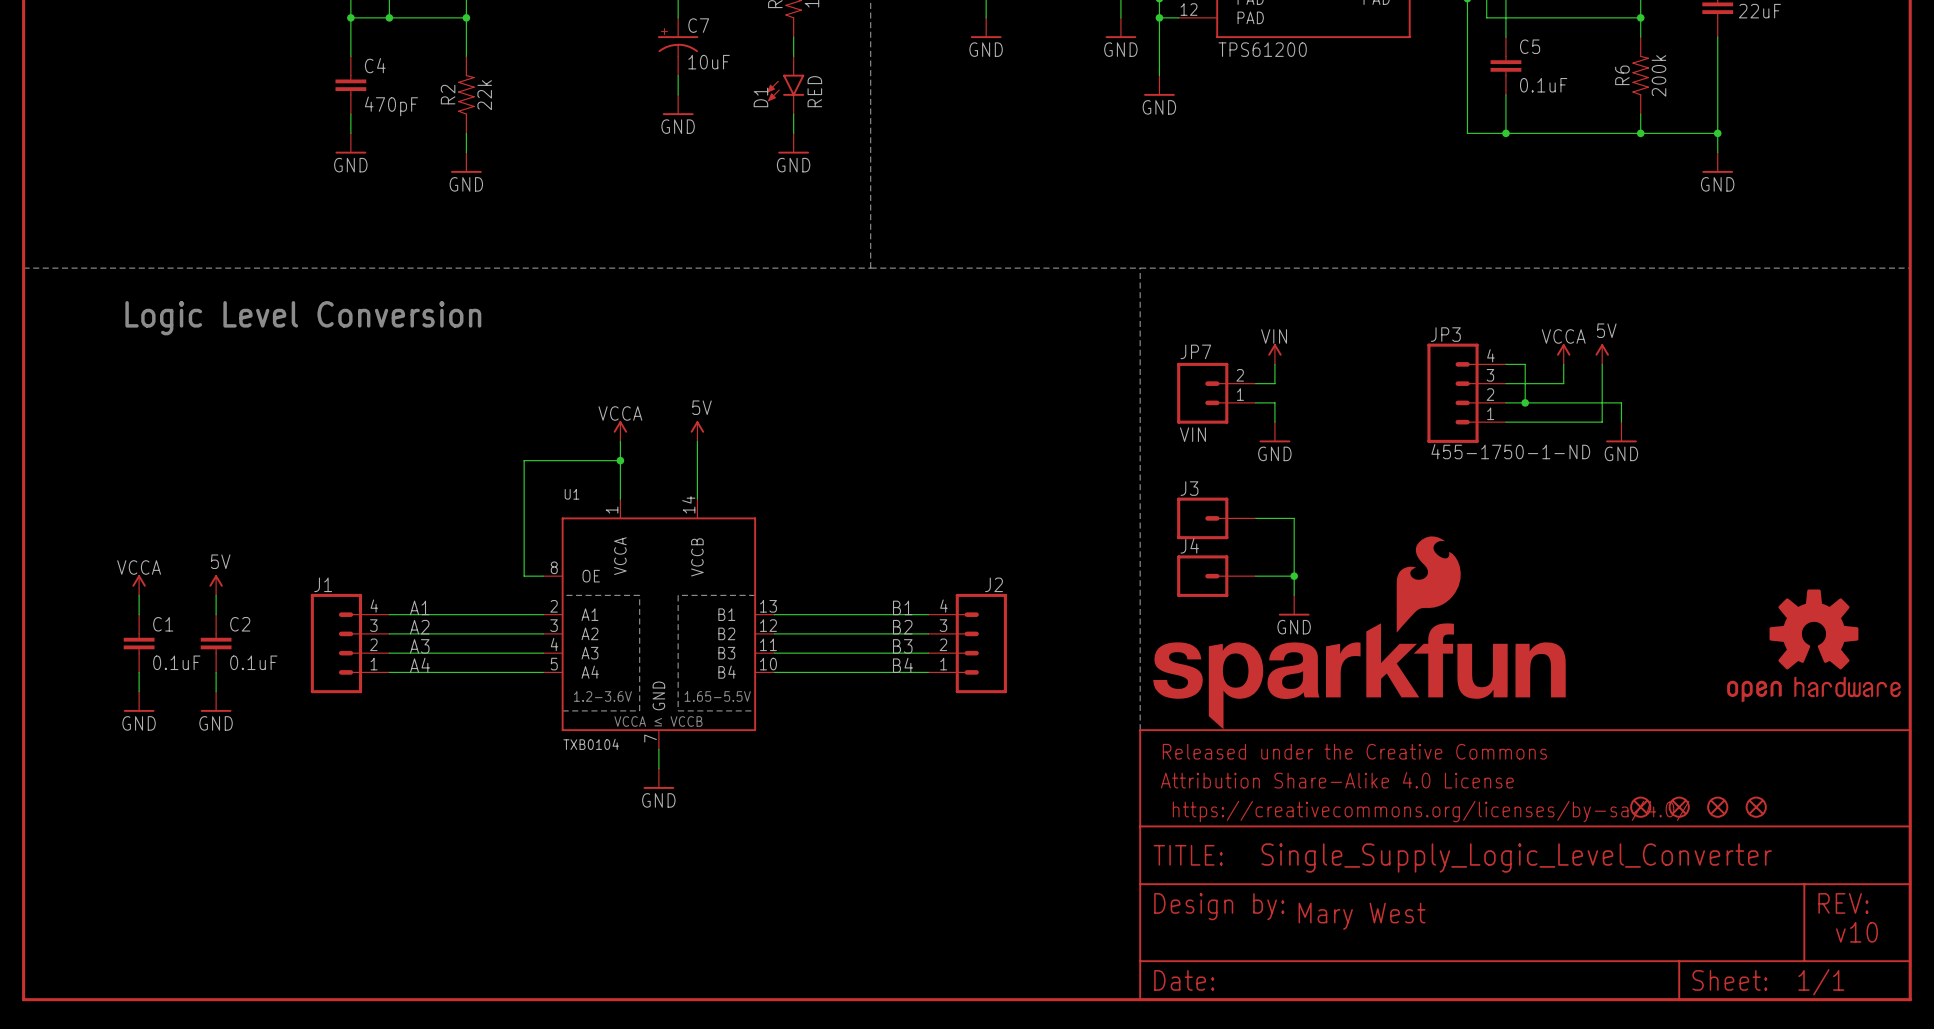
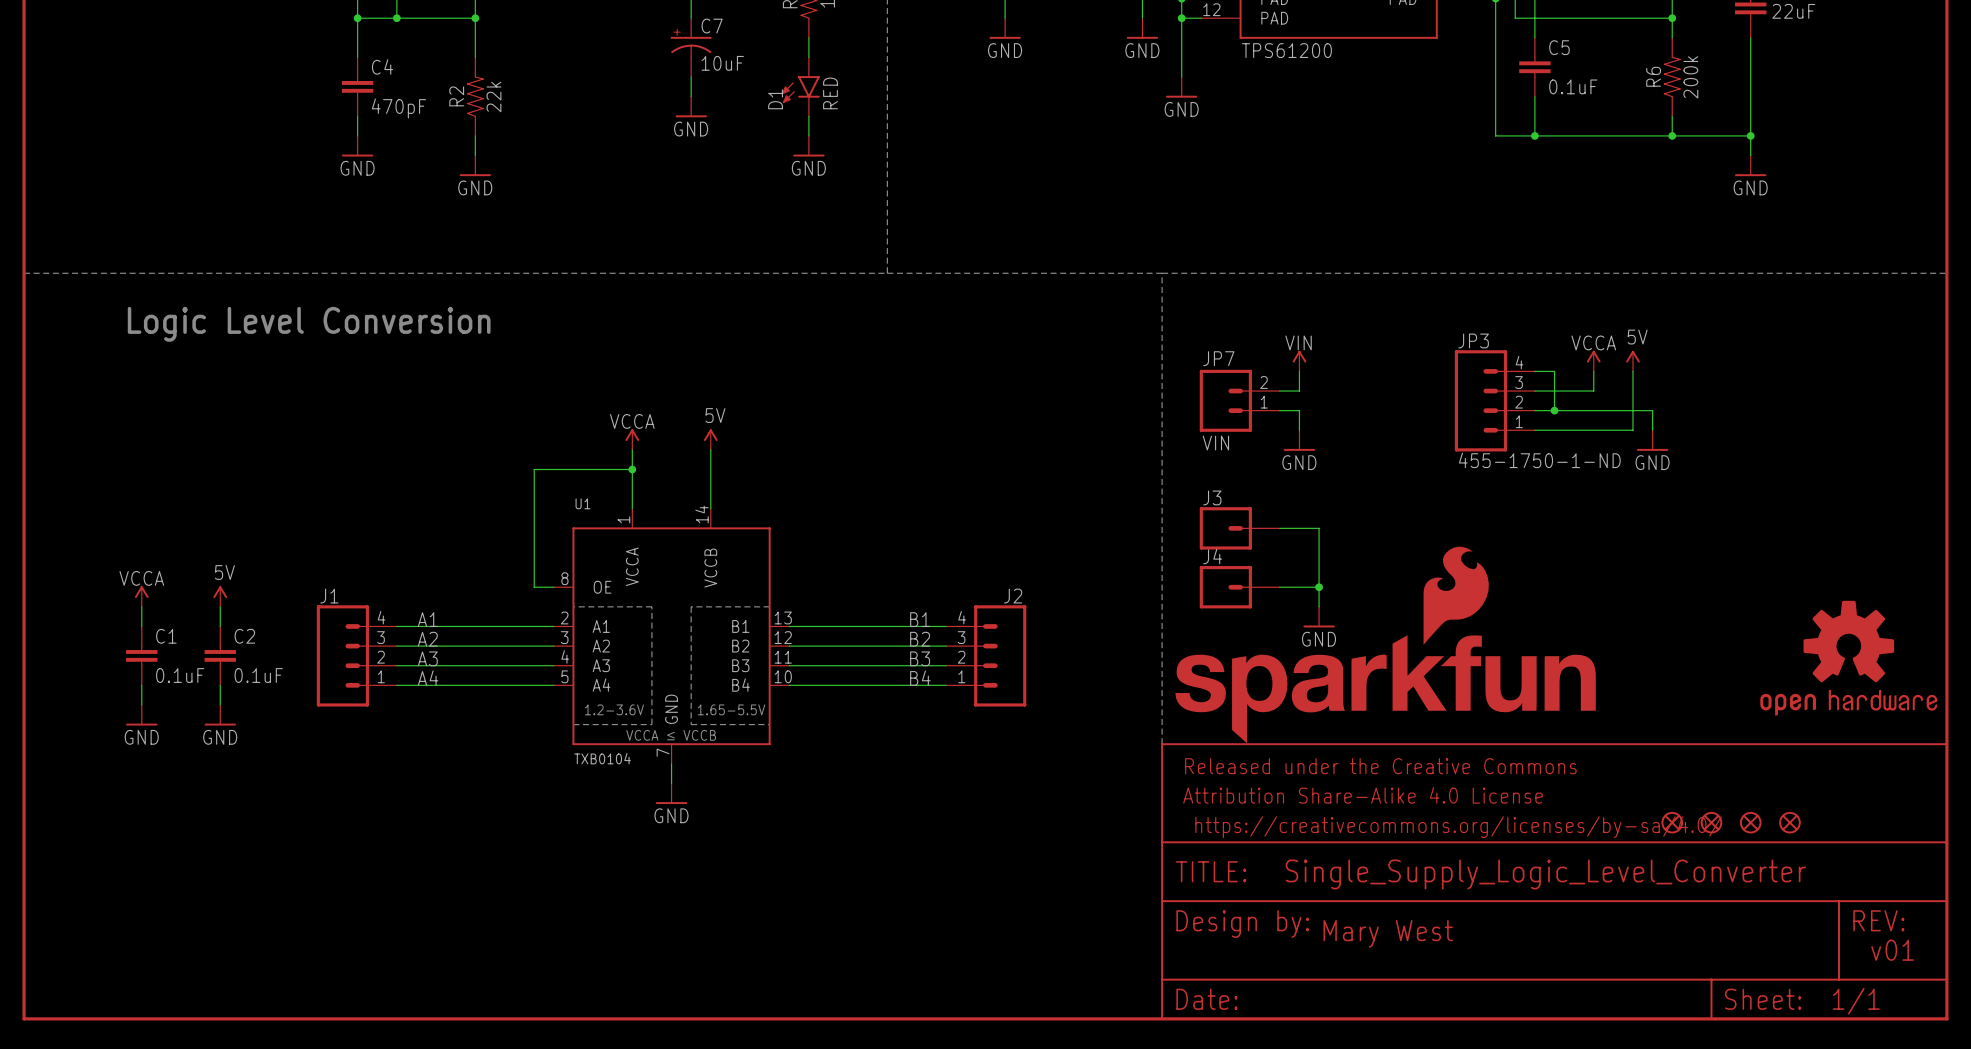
text: v10 (1856, 932) -> v01 (1892, 950)

